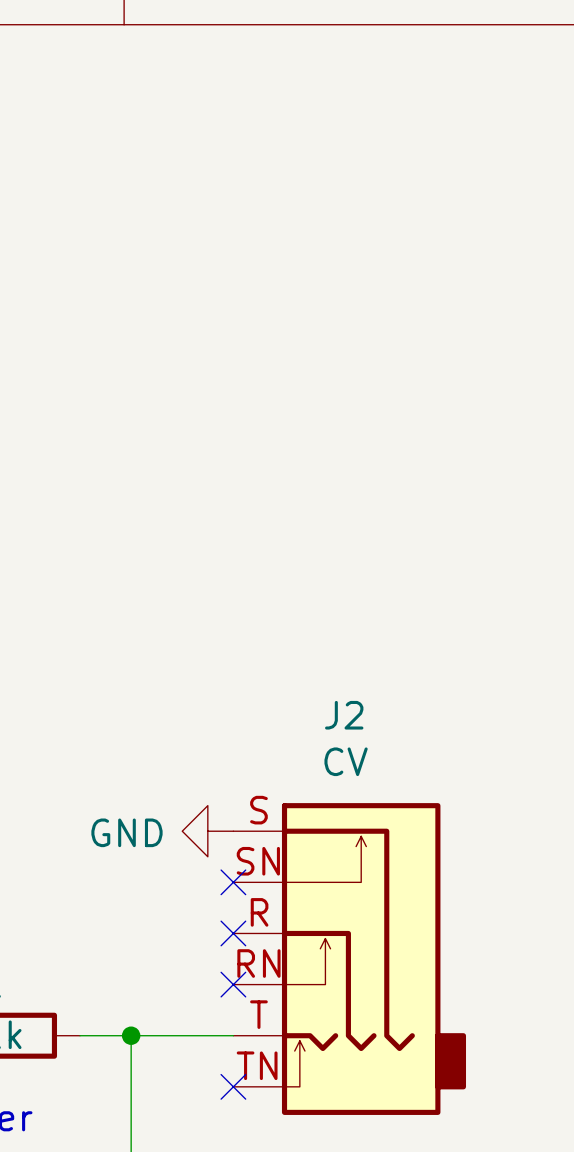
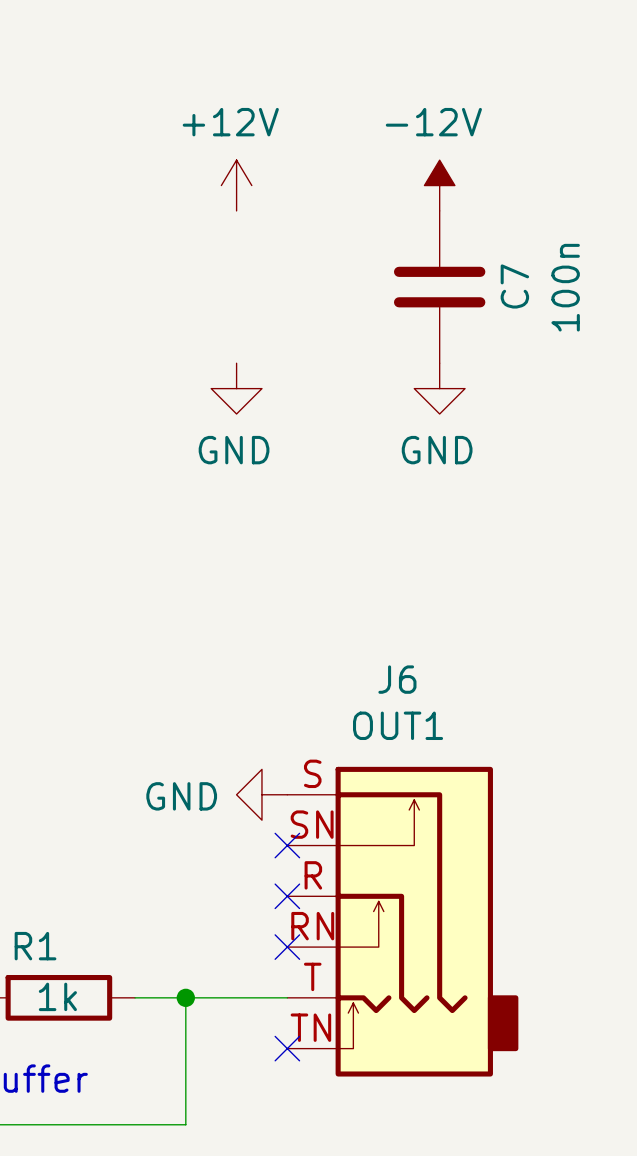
power symbol: none -> +12V (236, 185)
power symbol: none -> -12V (439, 185)
C7: none -> 100n (439, 287)
power symbol: none -> GND (236, 388)
power symbol: none -> GND (439, 388)
J2 name: J2 (344, 715) -> J6 (397, 679)
J2 value: CV (346, 761) -> OUT1 (398, 725)

